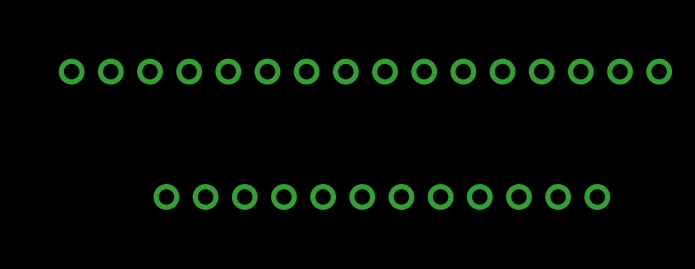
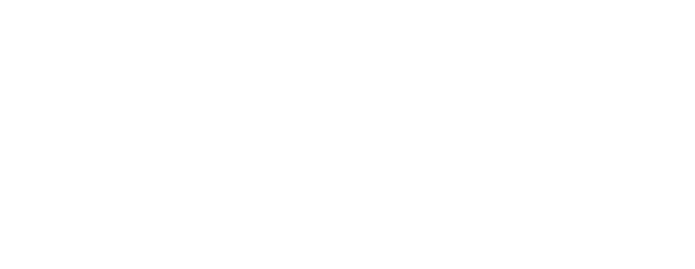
part: (365, 71) -> none
part: (381, 196) -> none

